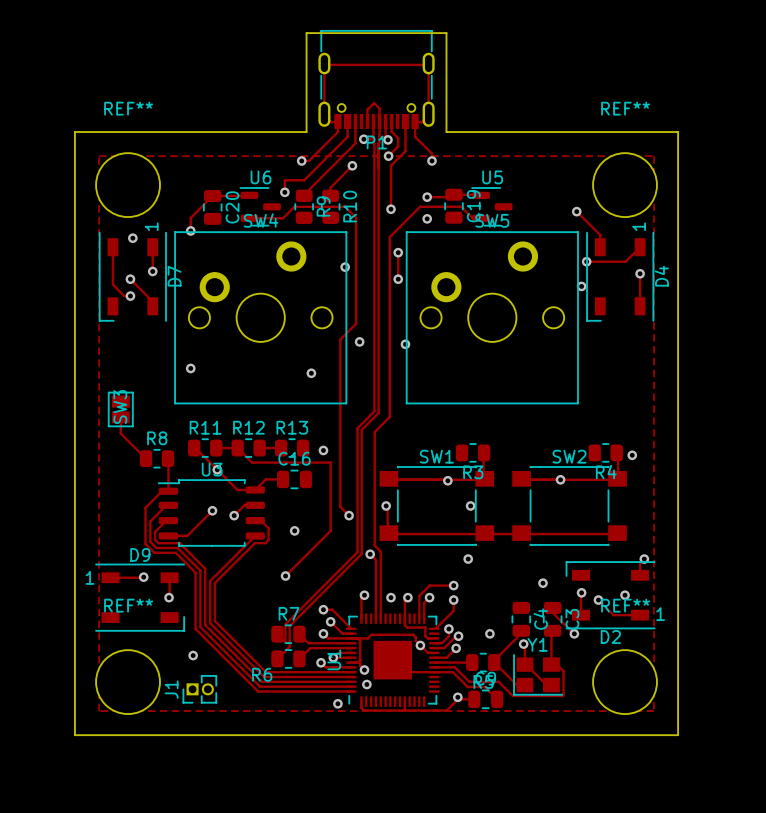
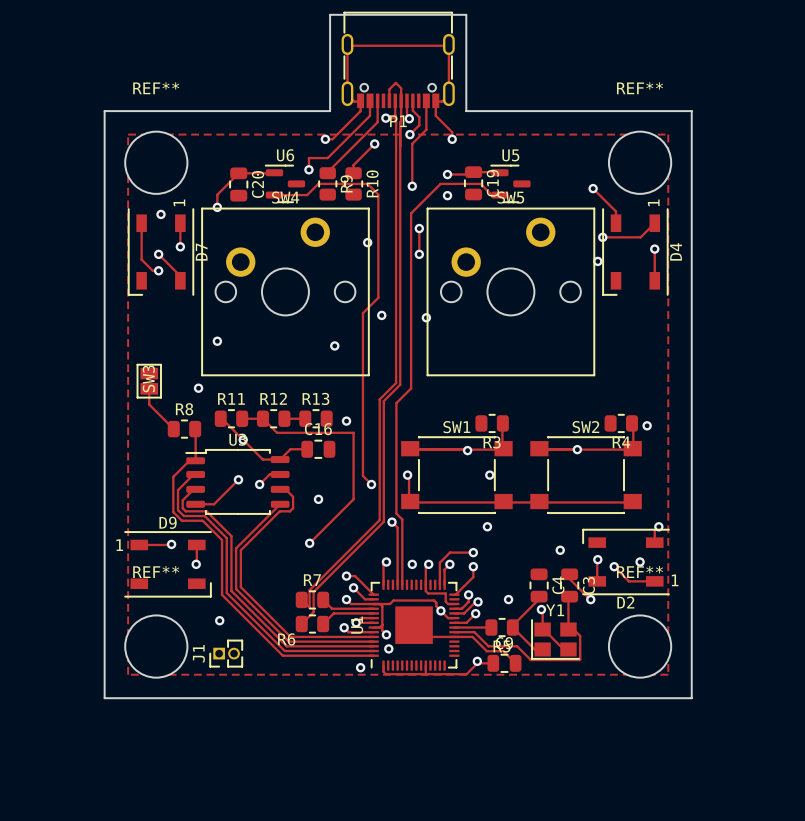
via: none -> (198, 388)

